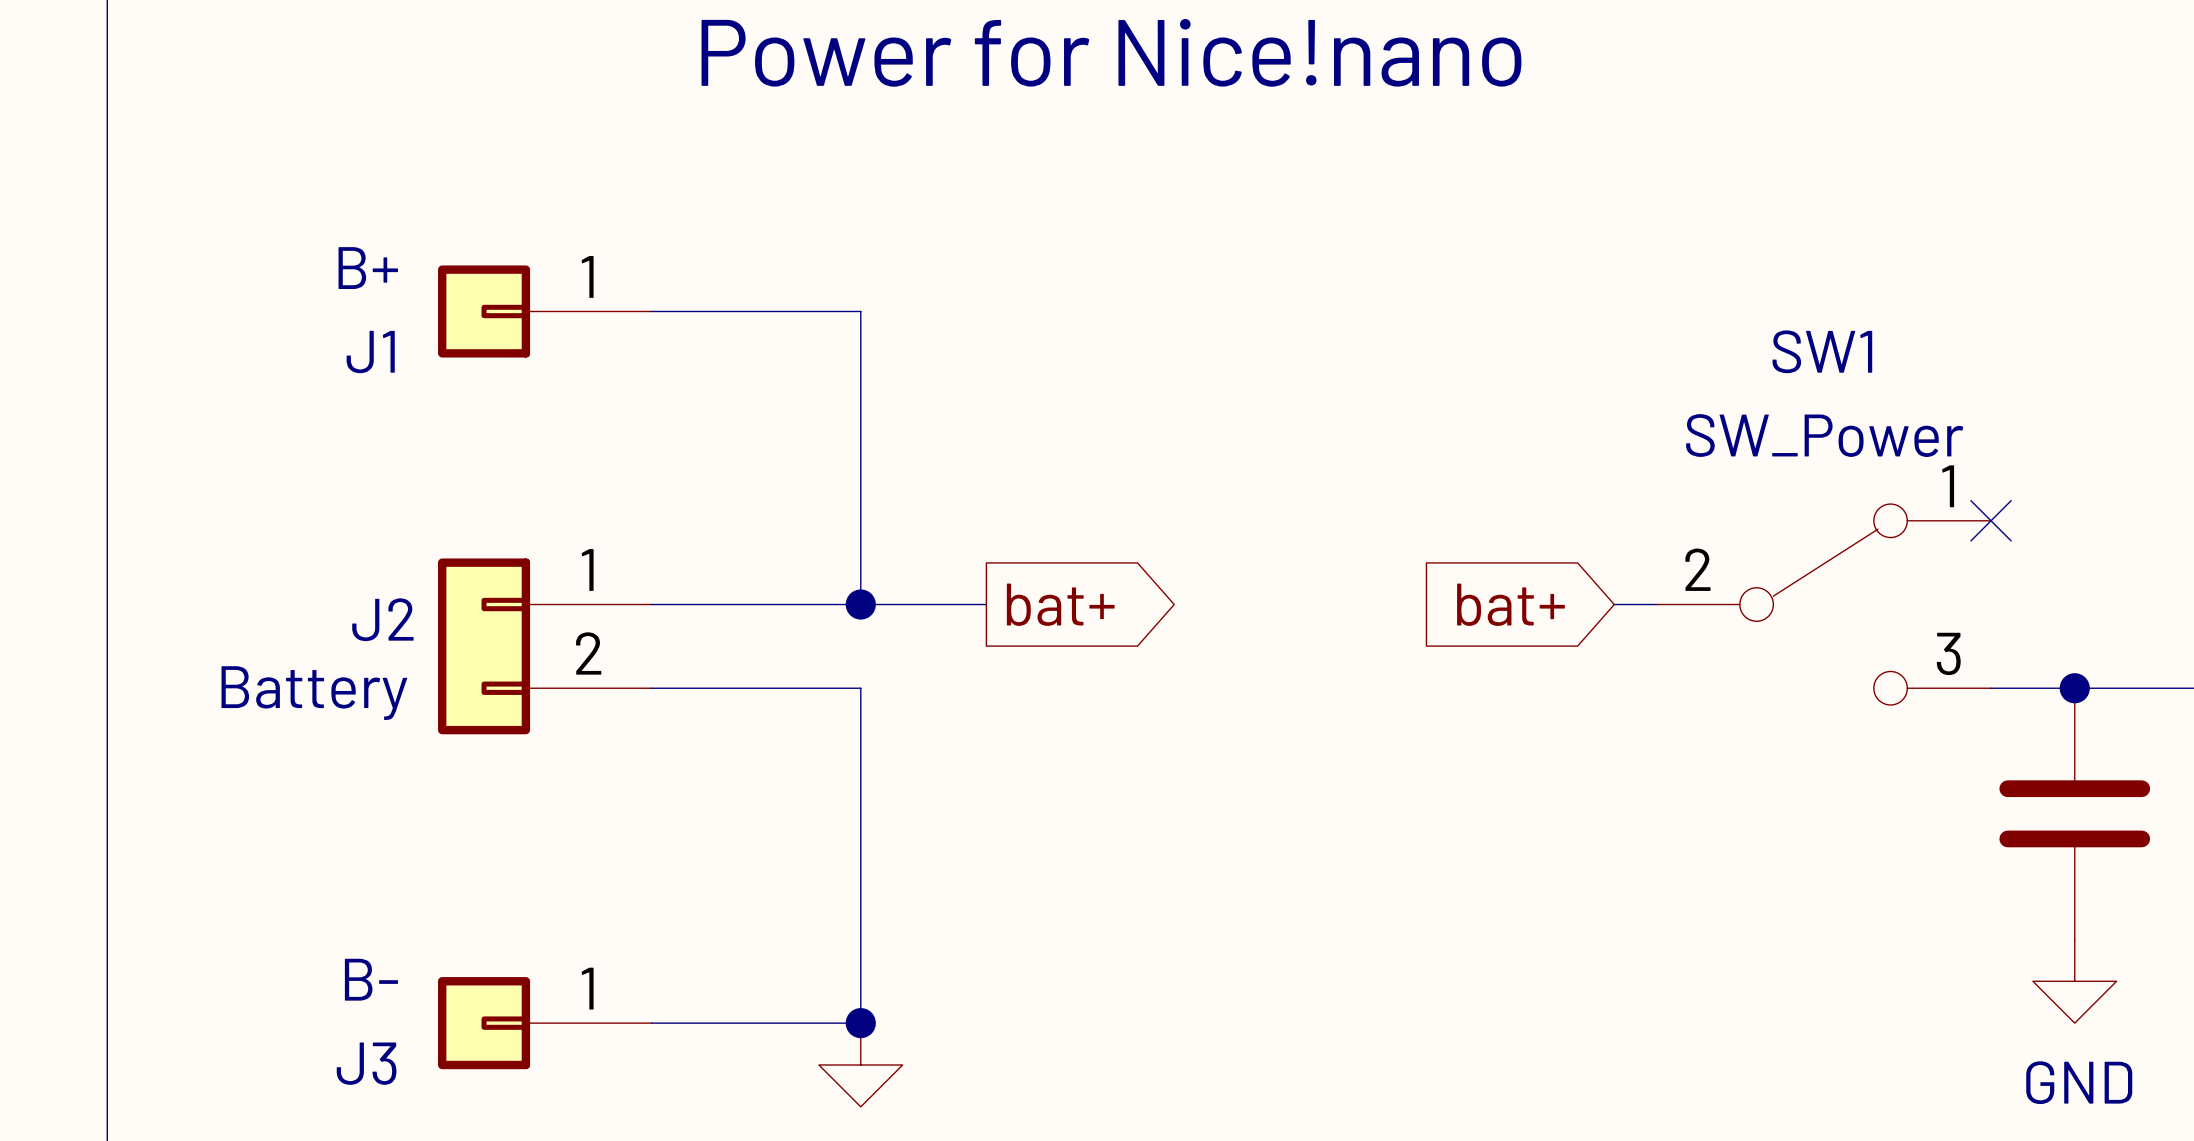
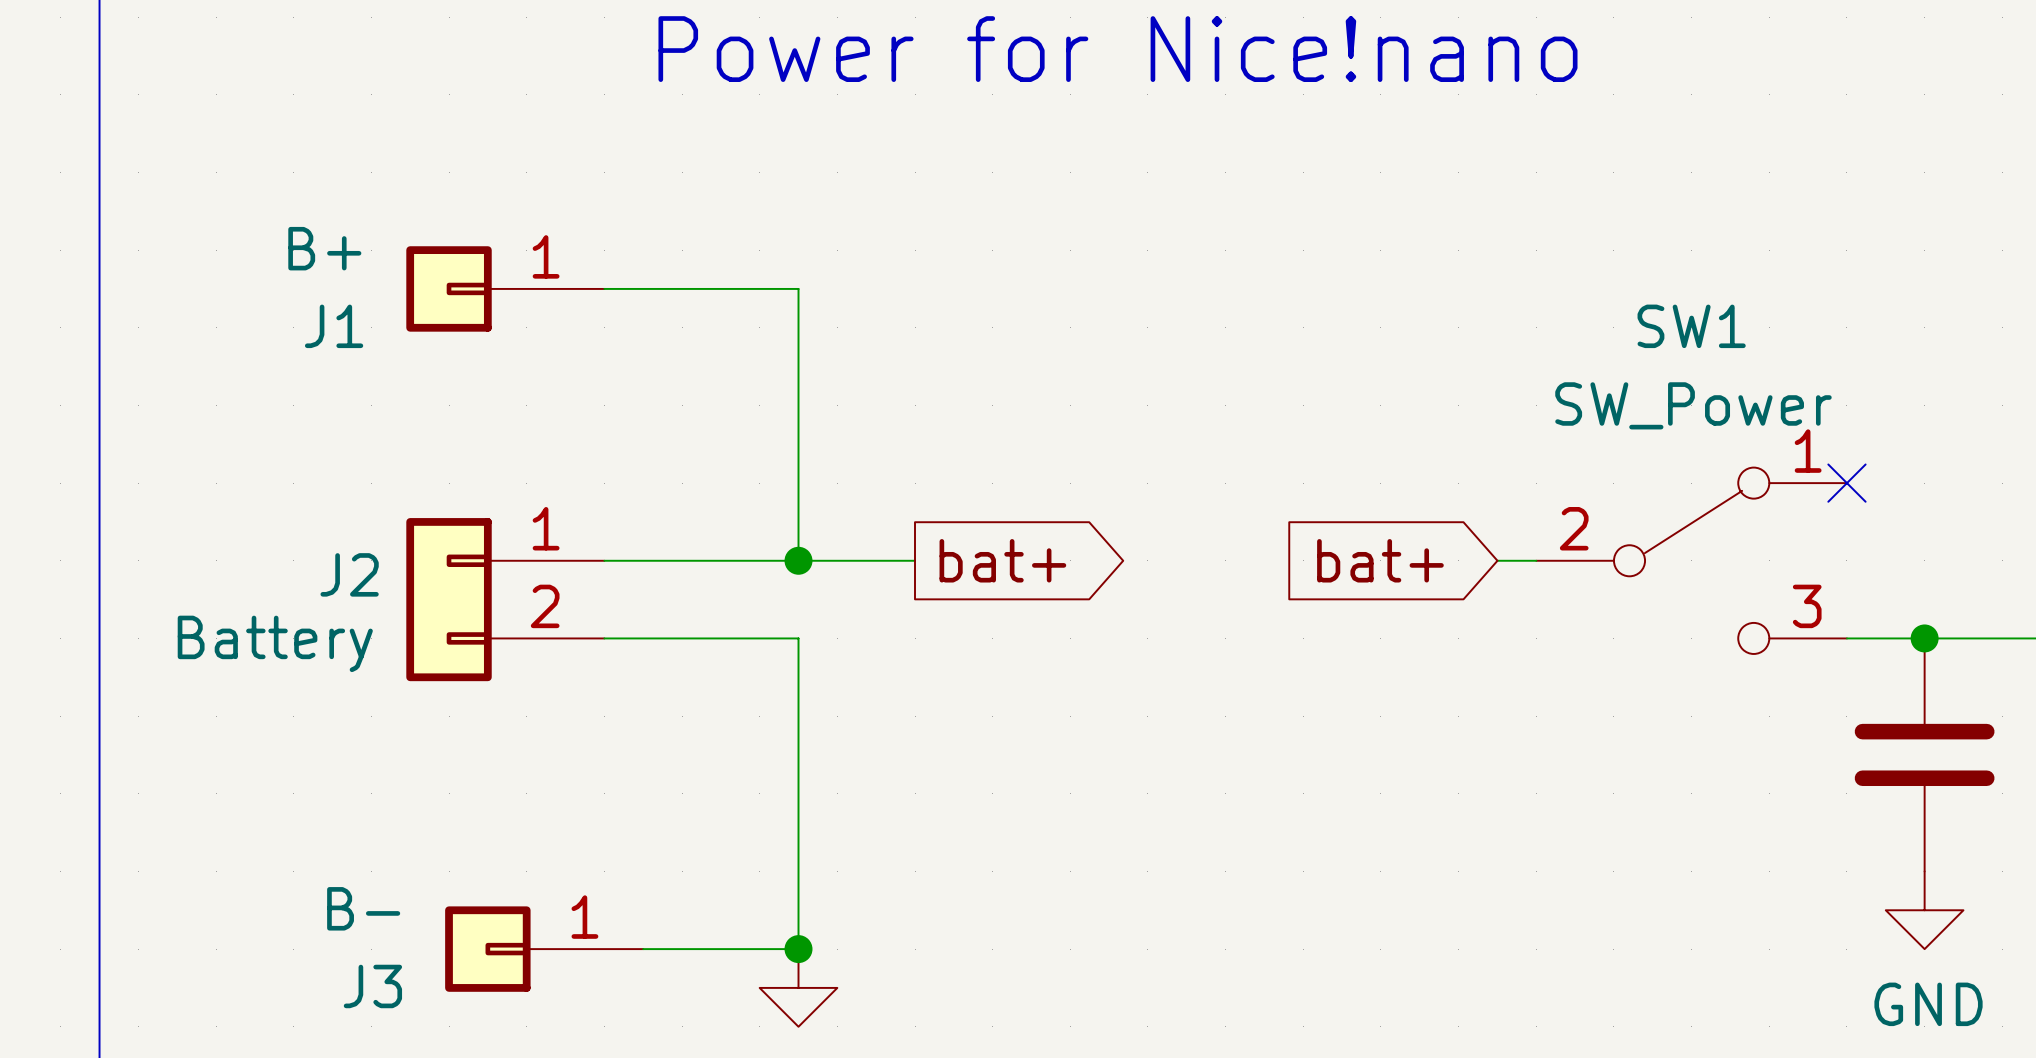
J3 position: (544, 1023) -> (544, 949)

